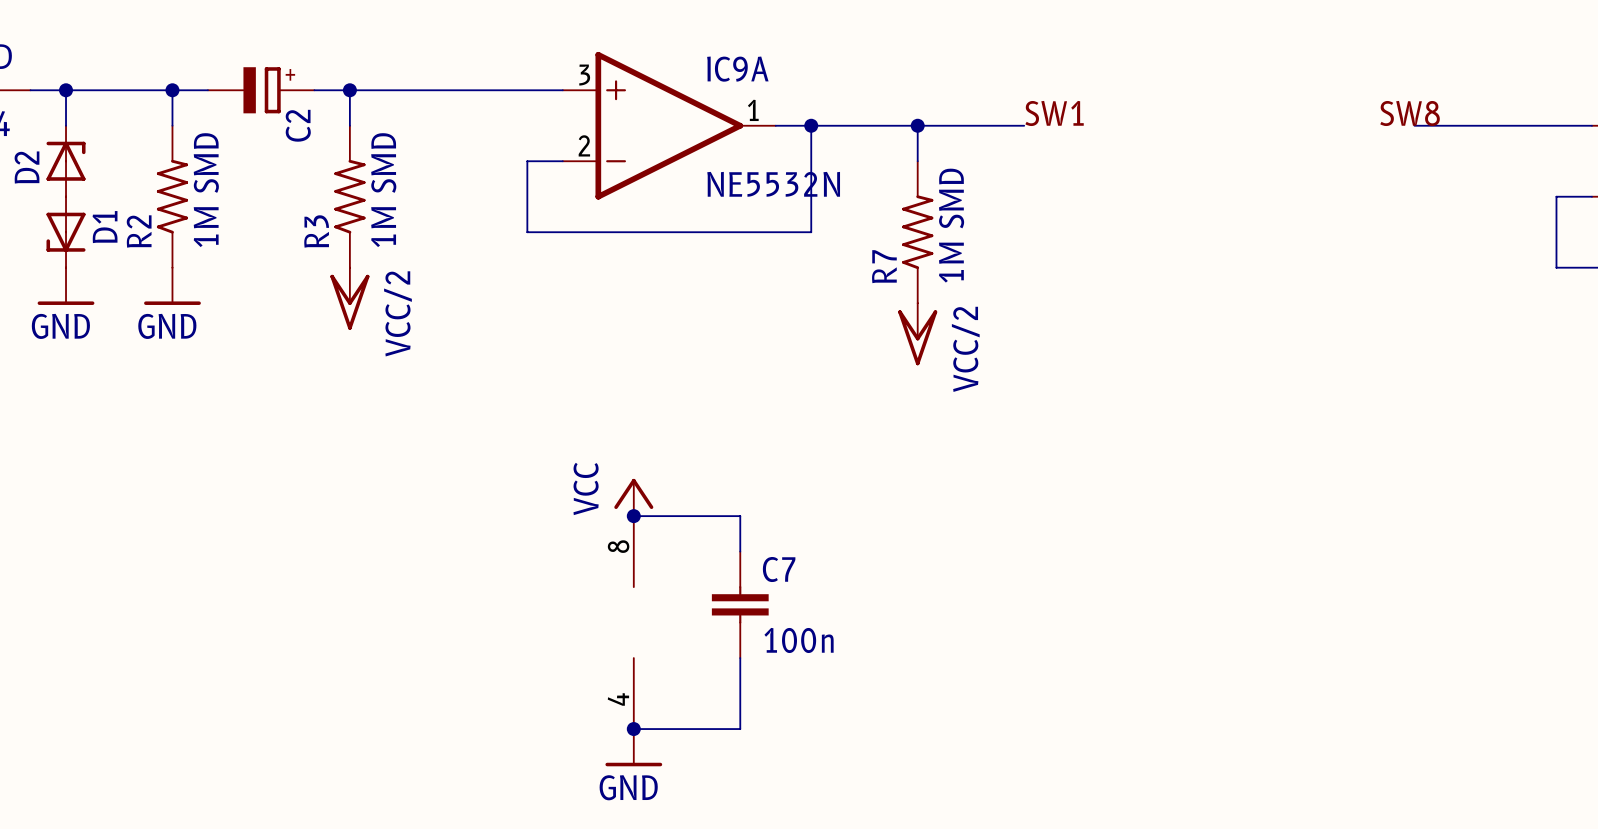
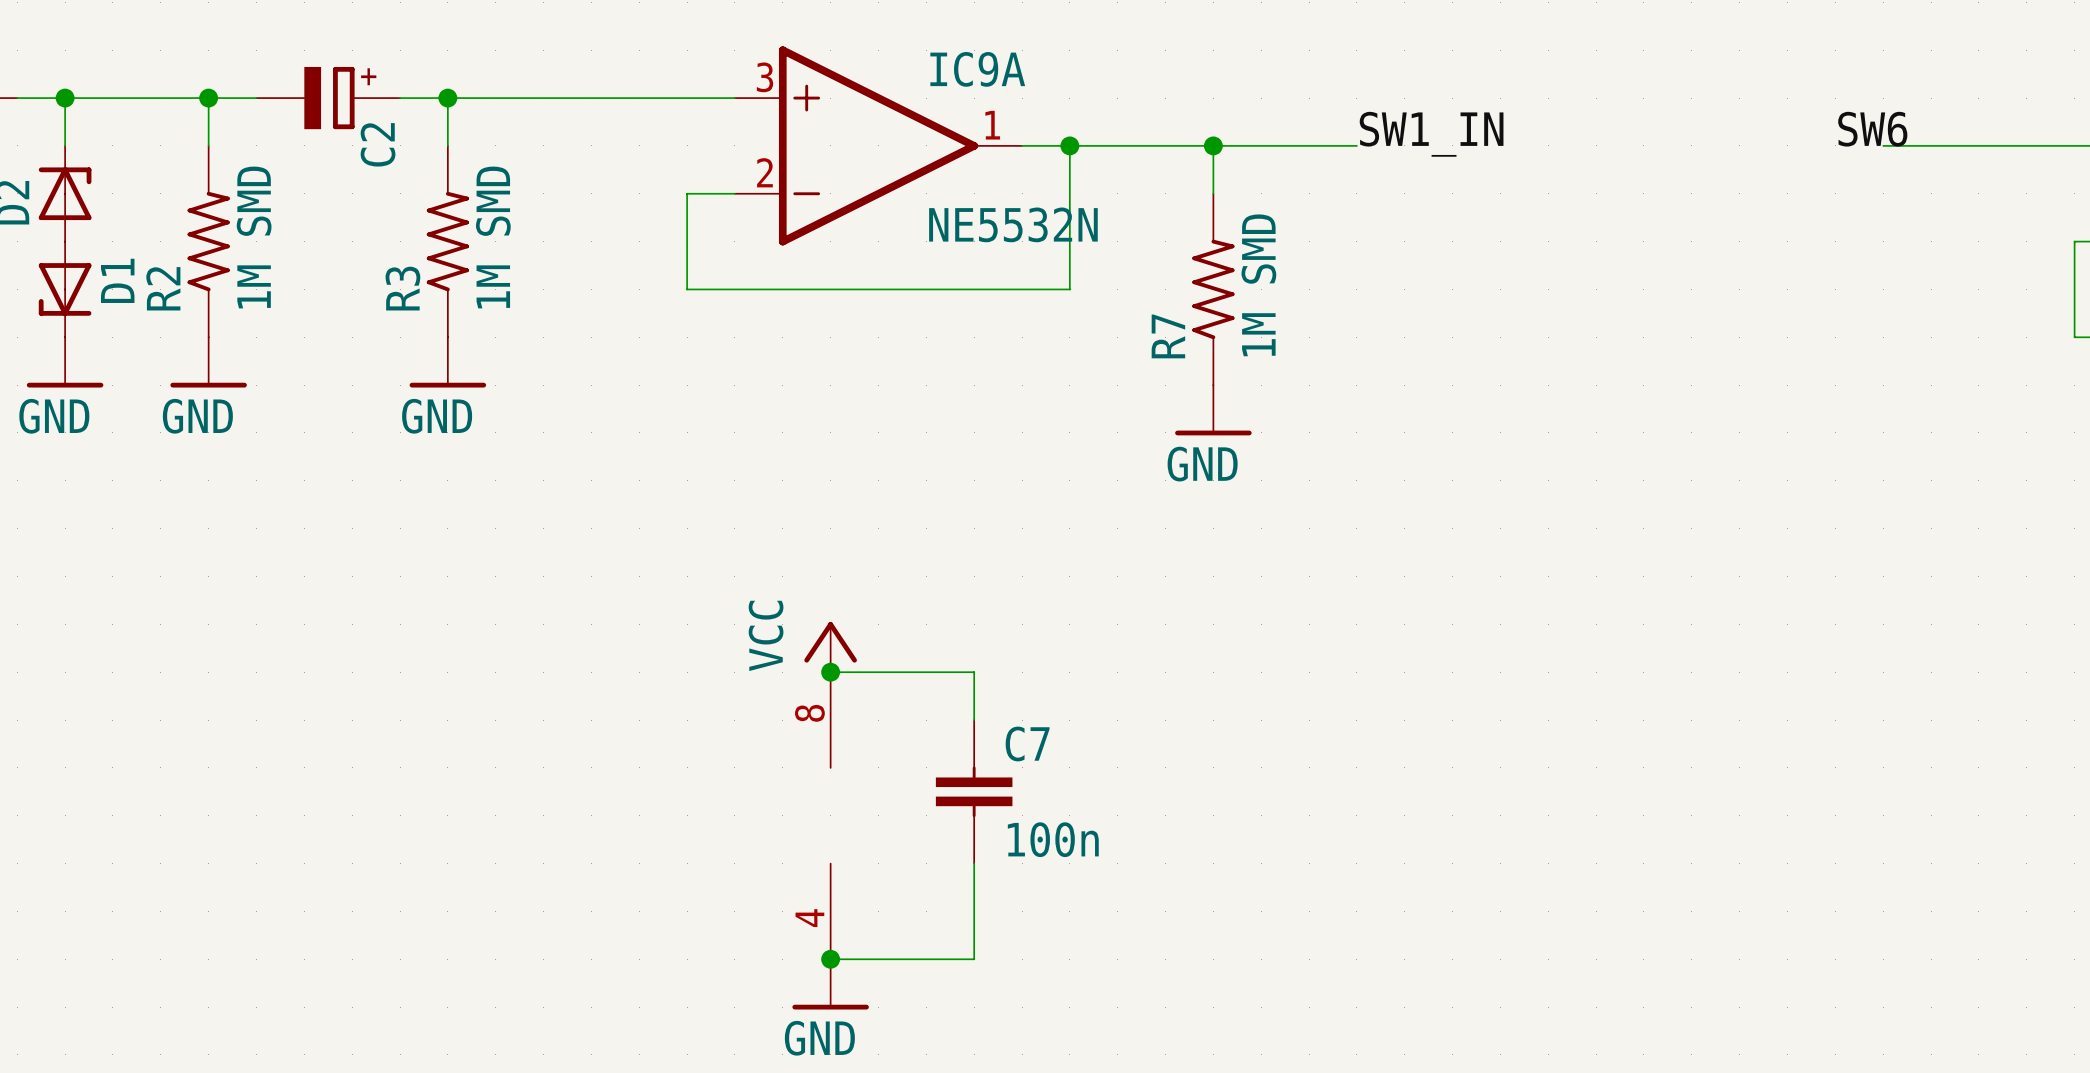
label: SW1 (1054, 113) -> SW1_IN (1431, 134)
label: SW8 (1410, 113) -> SW6 (1872, 129)
power symbol: VCC/2 (349, 298) -> GND (447, 362)
power symbol: VCC/2 (917, 334) -> GND (1213, 410)

